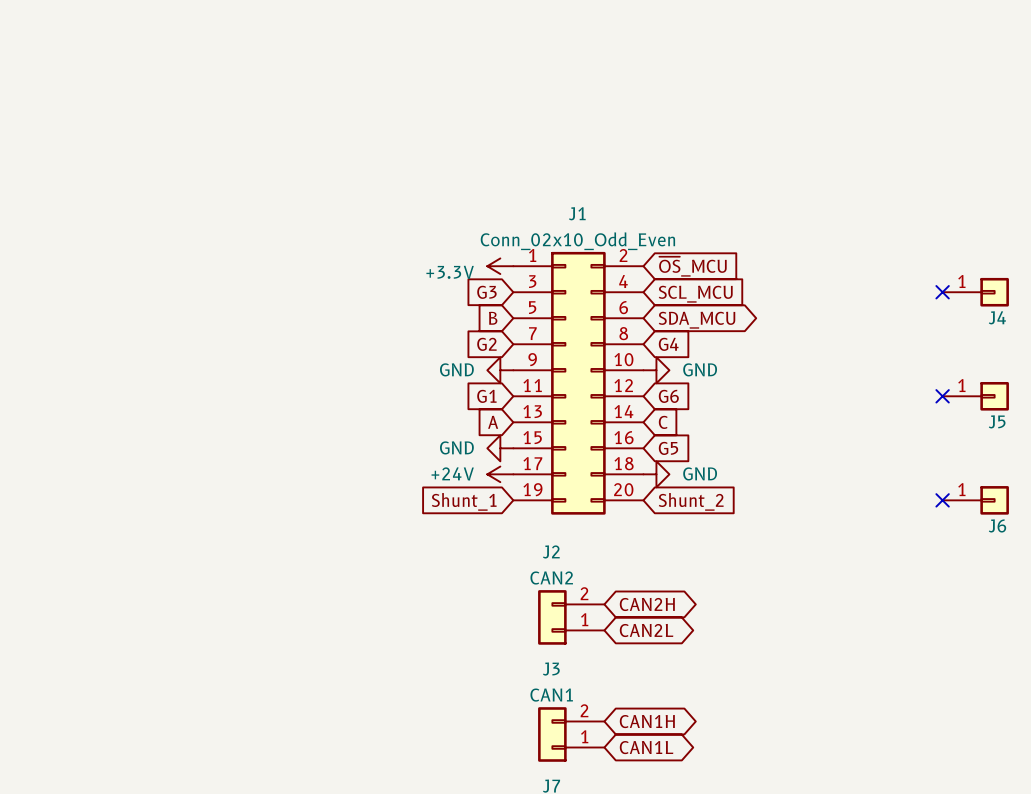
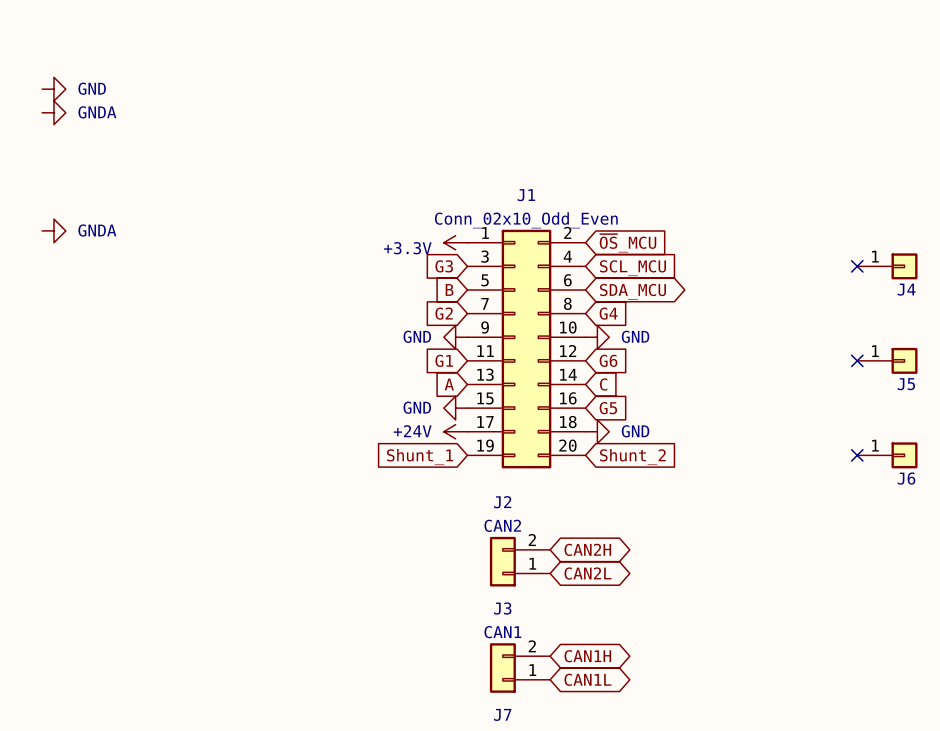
power symbol: none -> GND (53, 89)
power symbol: none -> GNDA (53, 112)
power symbol: none -> GNDA (53, 230)

